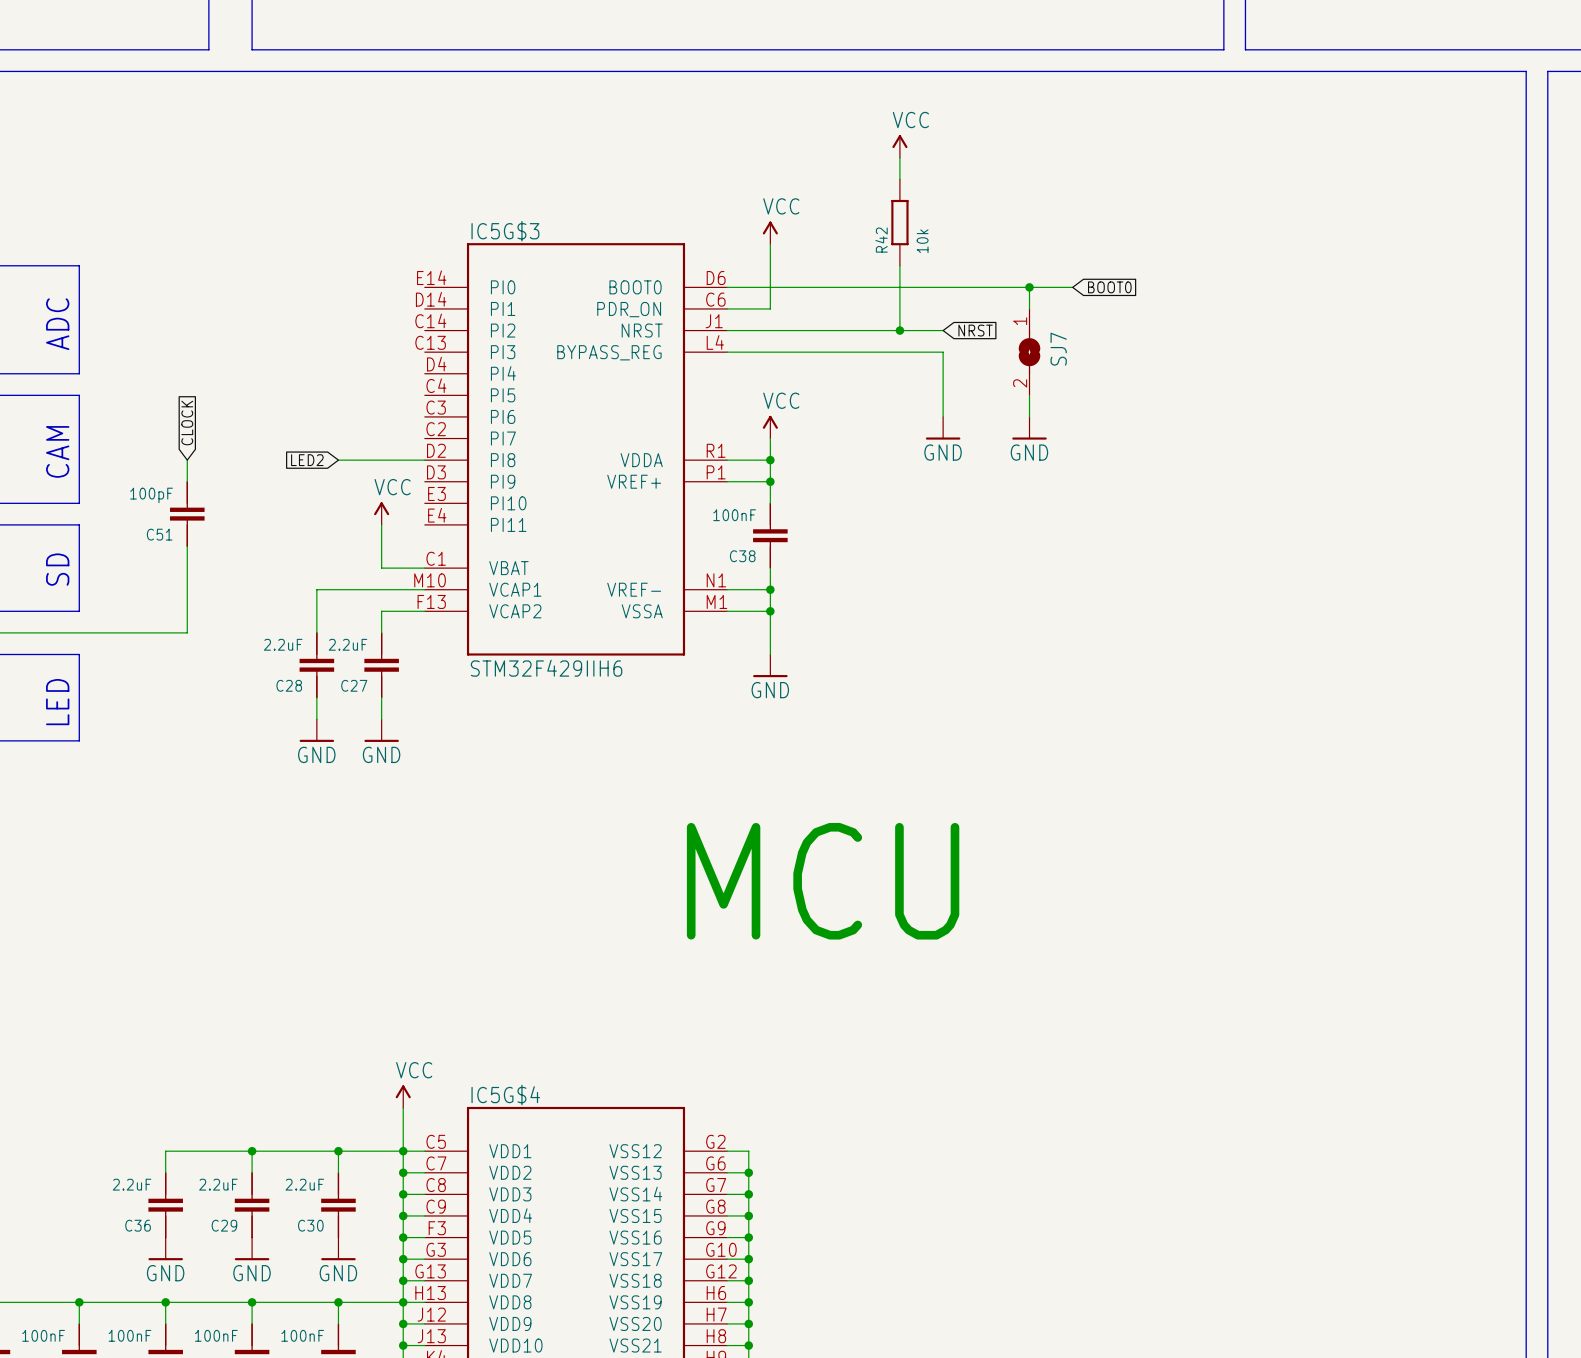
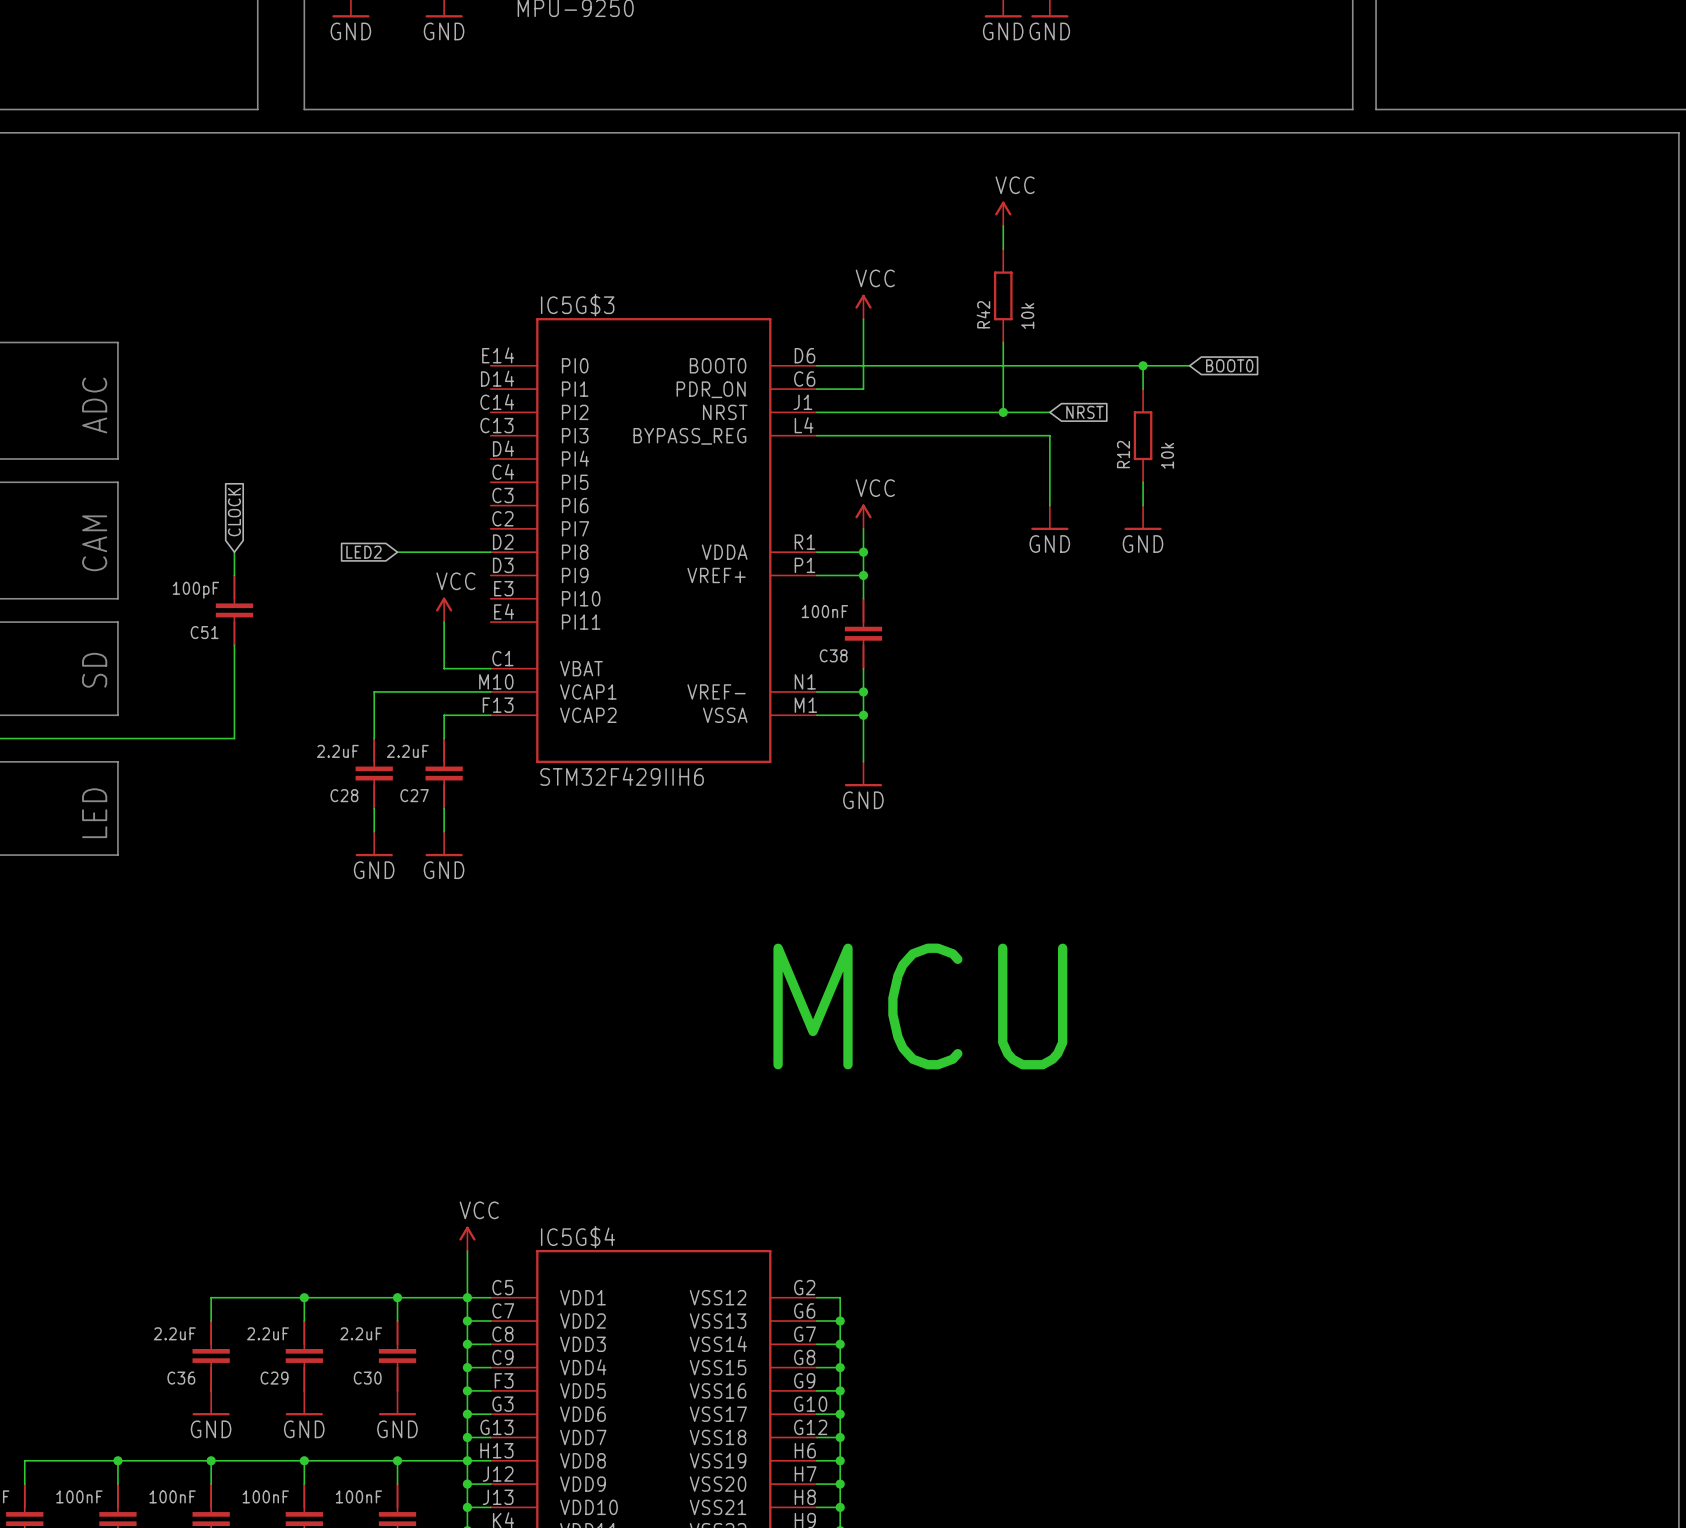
SJ7: (1029, 352) -> none
R12: none -> 10k (1143, 435)

